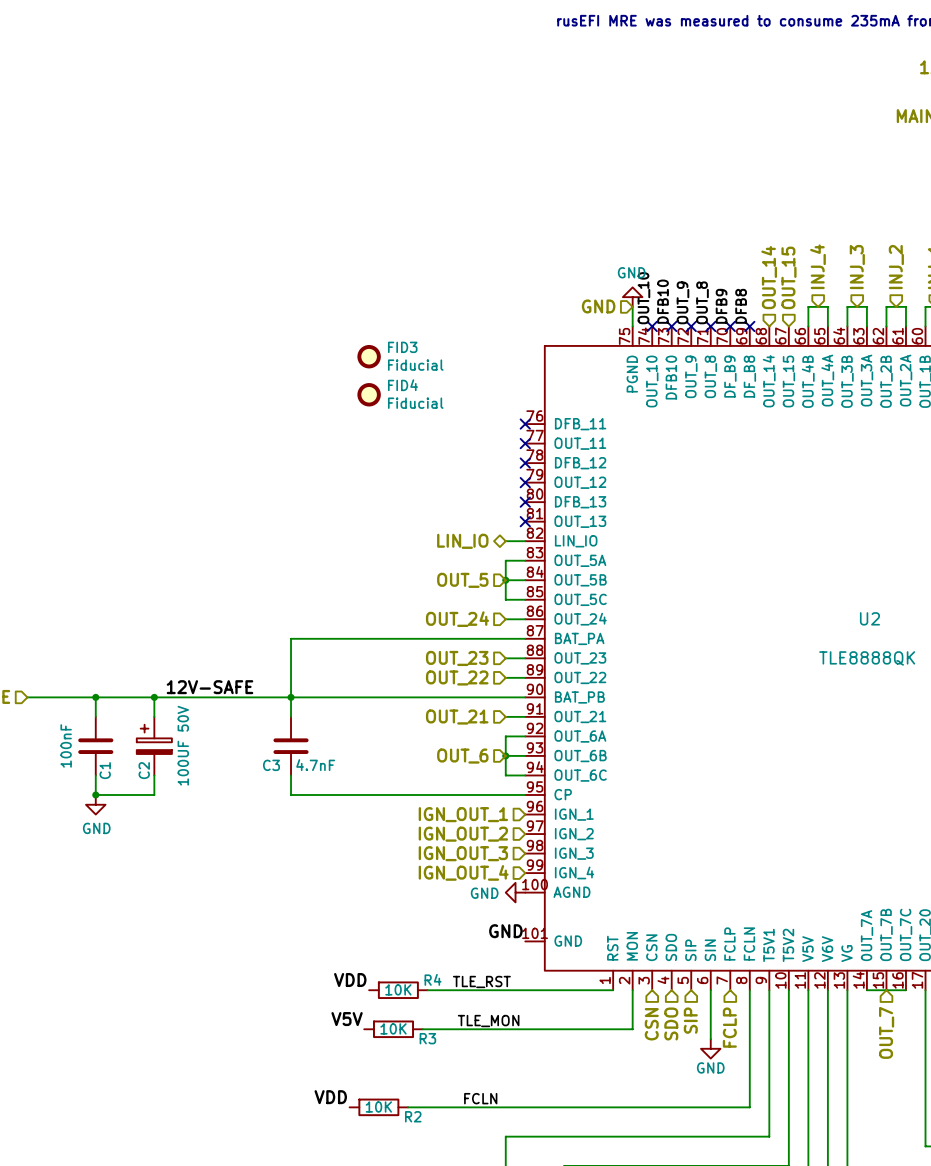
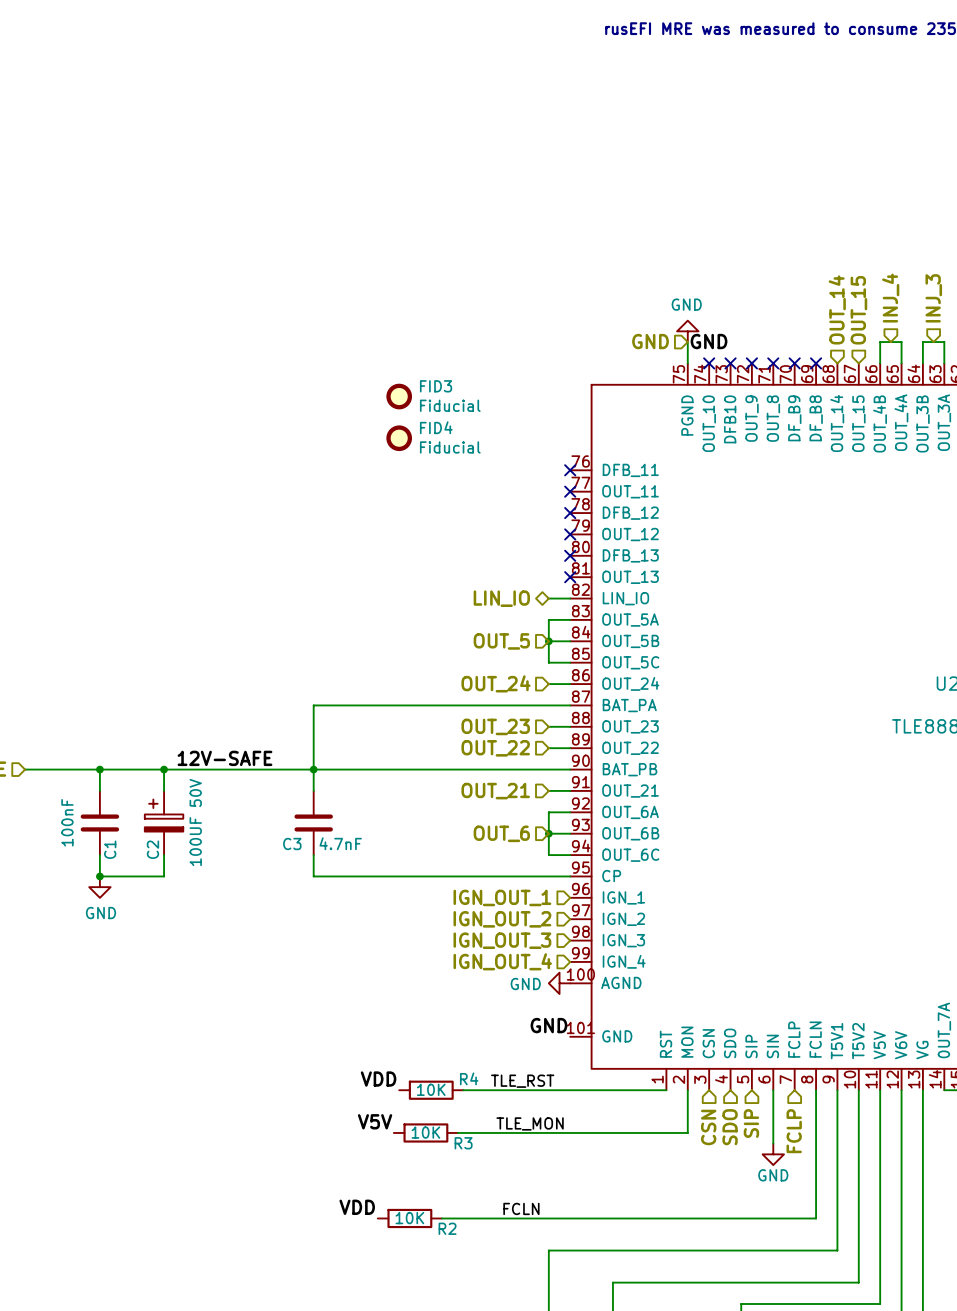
label: OUT_10 (643, 298) -> none
label: DFB10 (663, 301) -> none
label: OUT_9 (682, 302) -> none
label: OUT_8 (702, 302) -> none
label: none -> GND (709, 341)
label: DFB9 (721, 306) -> none
label: DFB8 (741, 306) -> none

